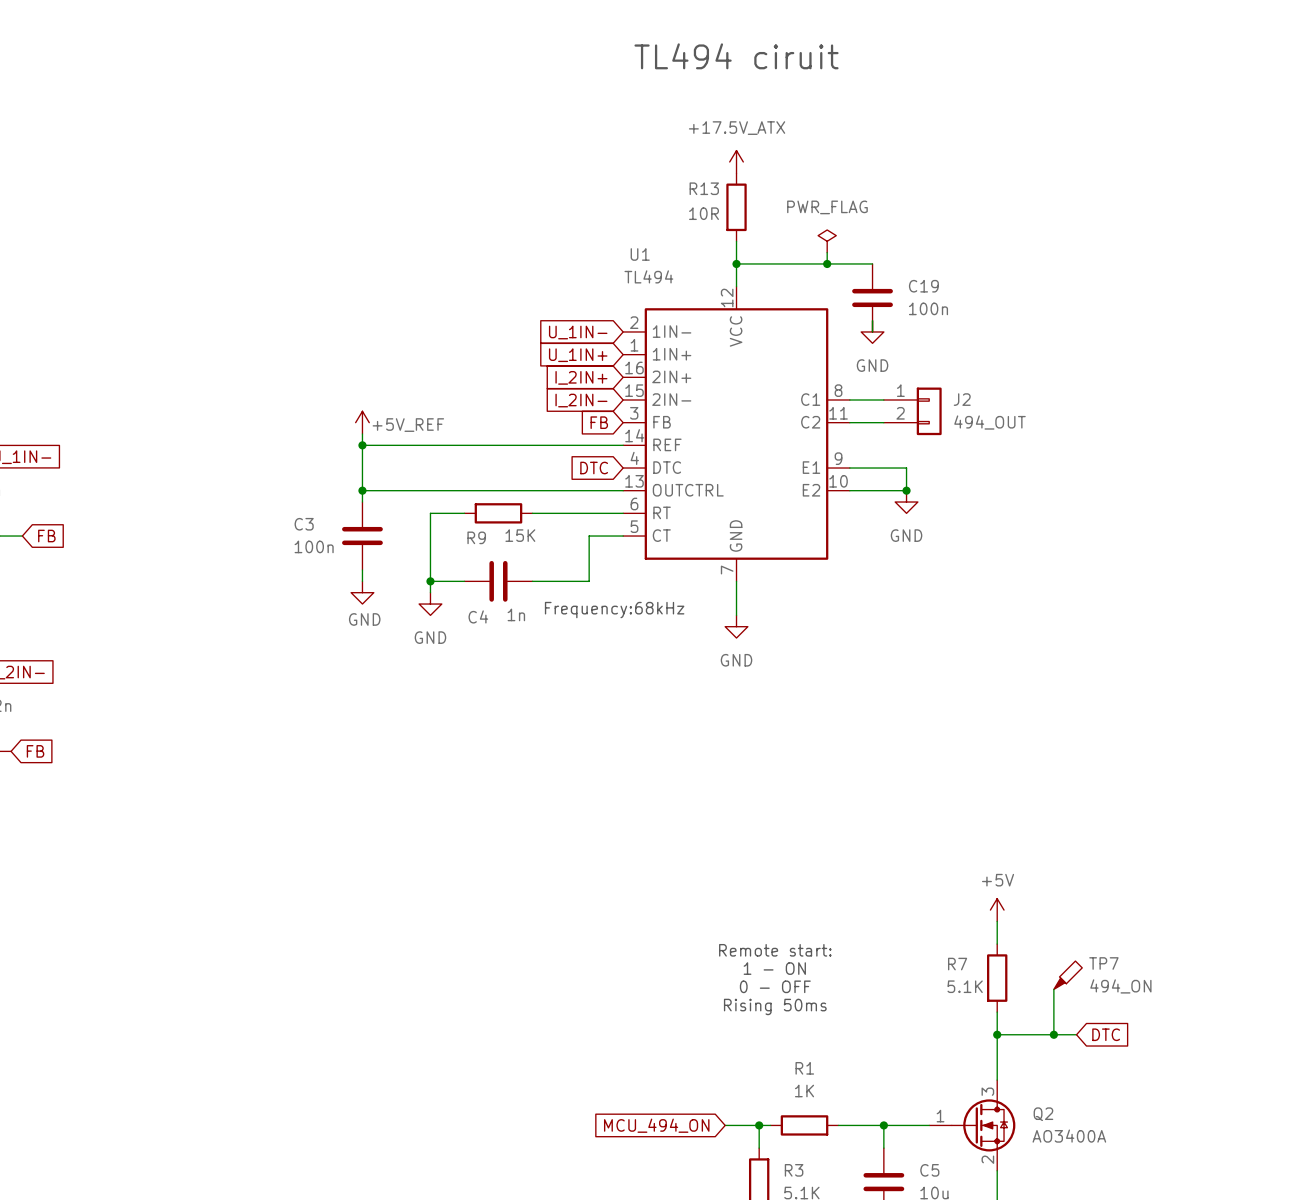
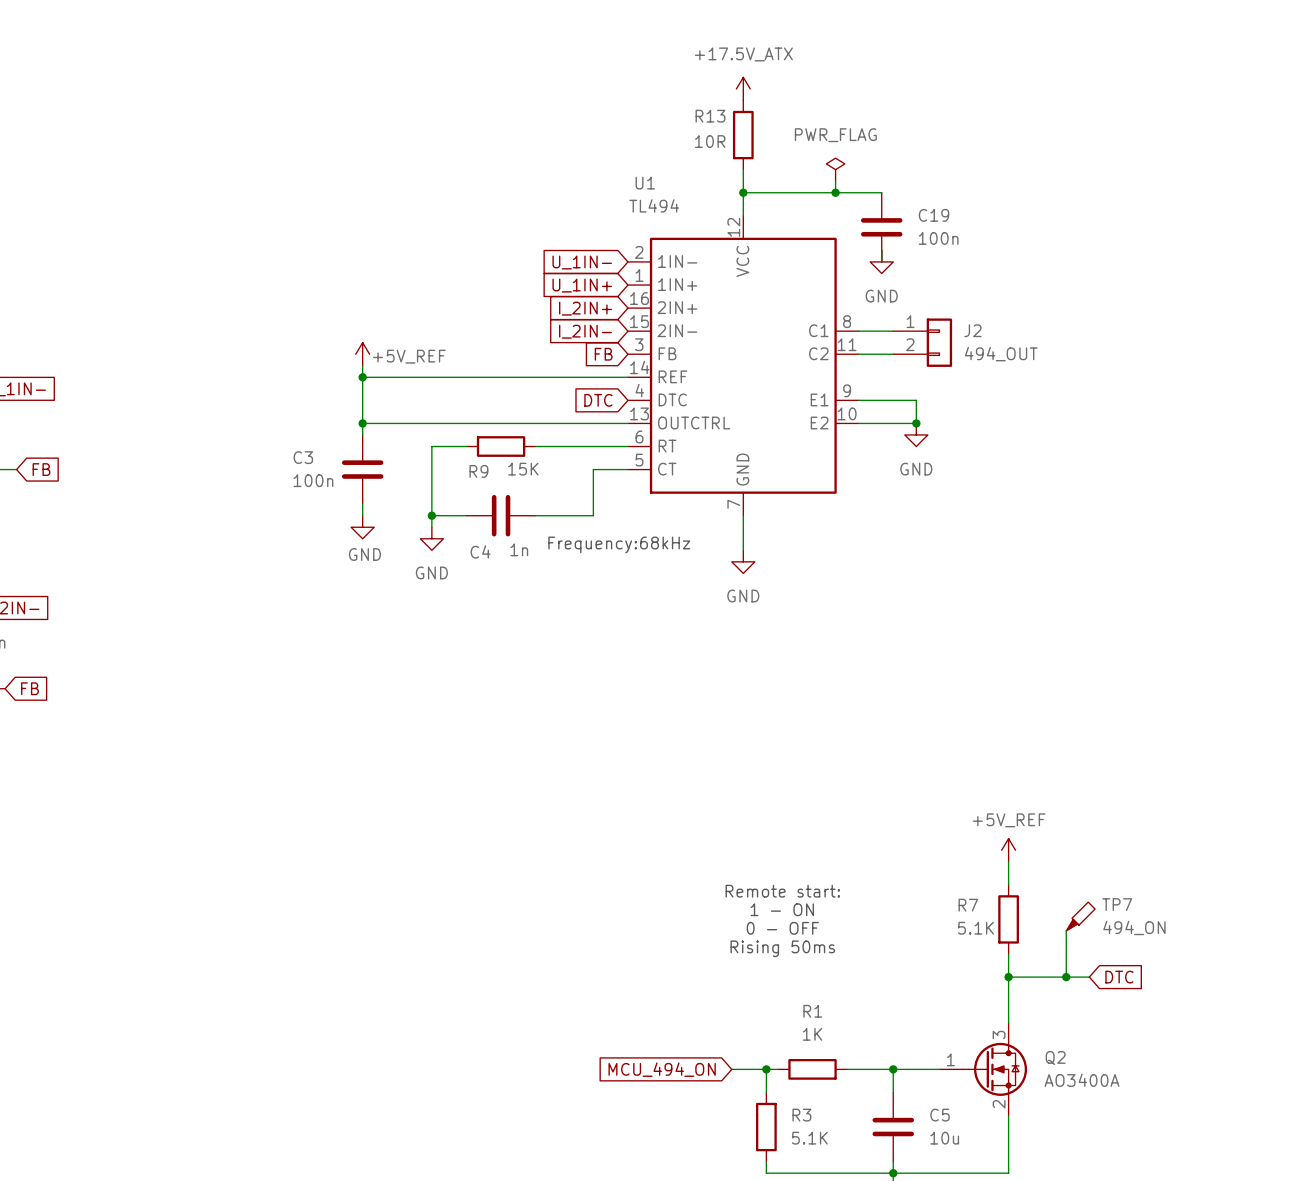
power symbol: +5V (997, 910) -> +5V_REF (1008, 850)

